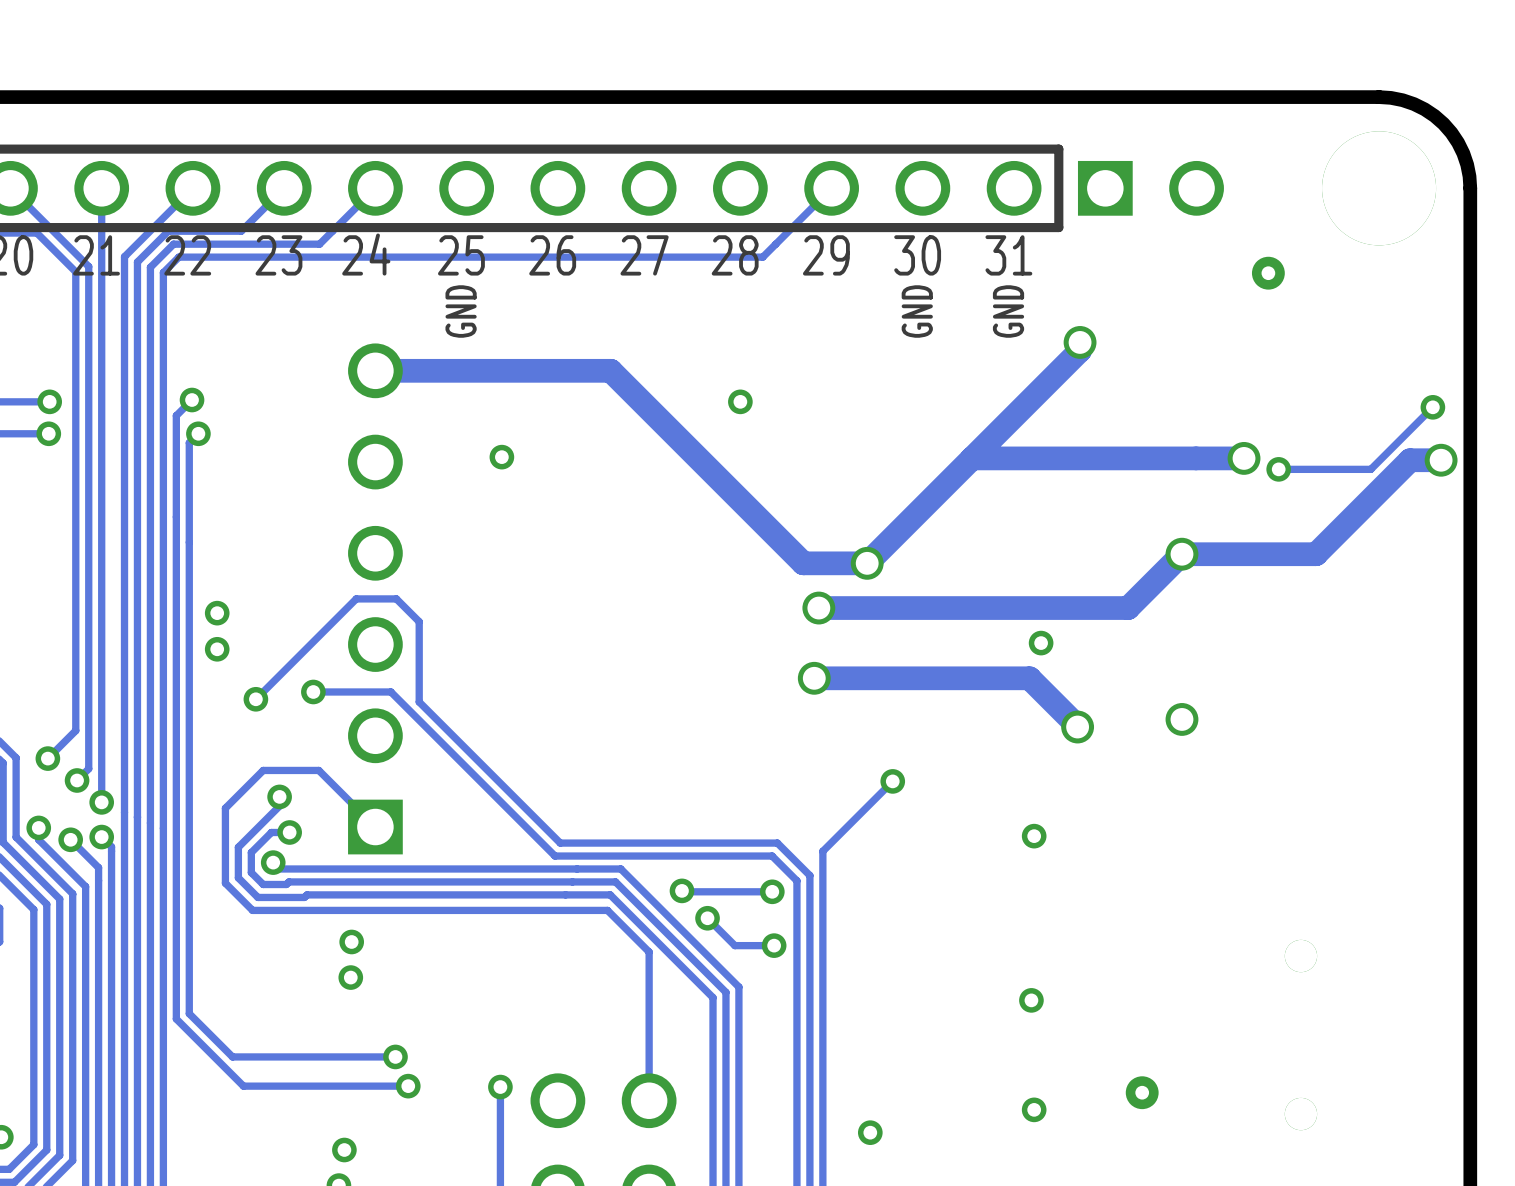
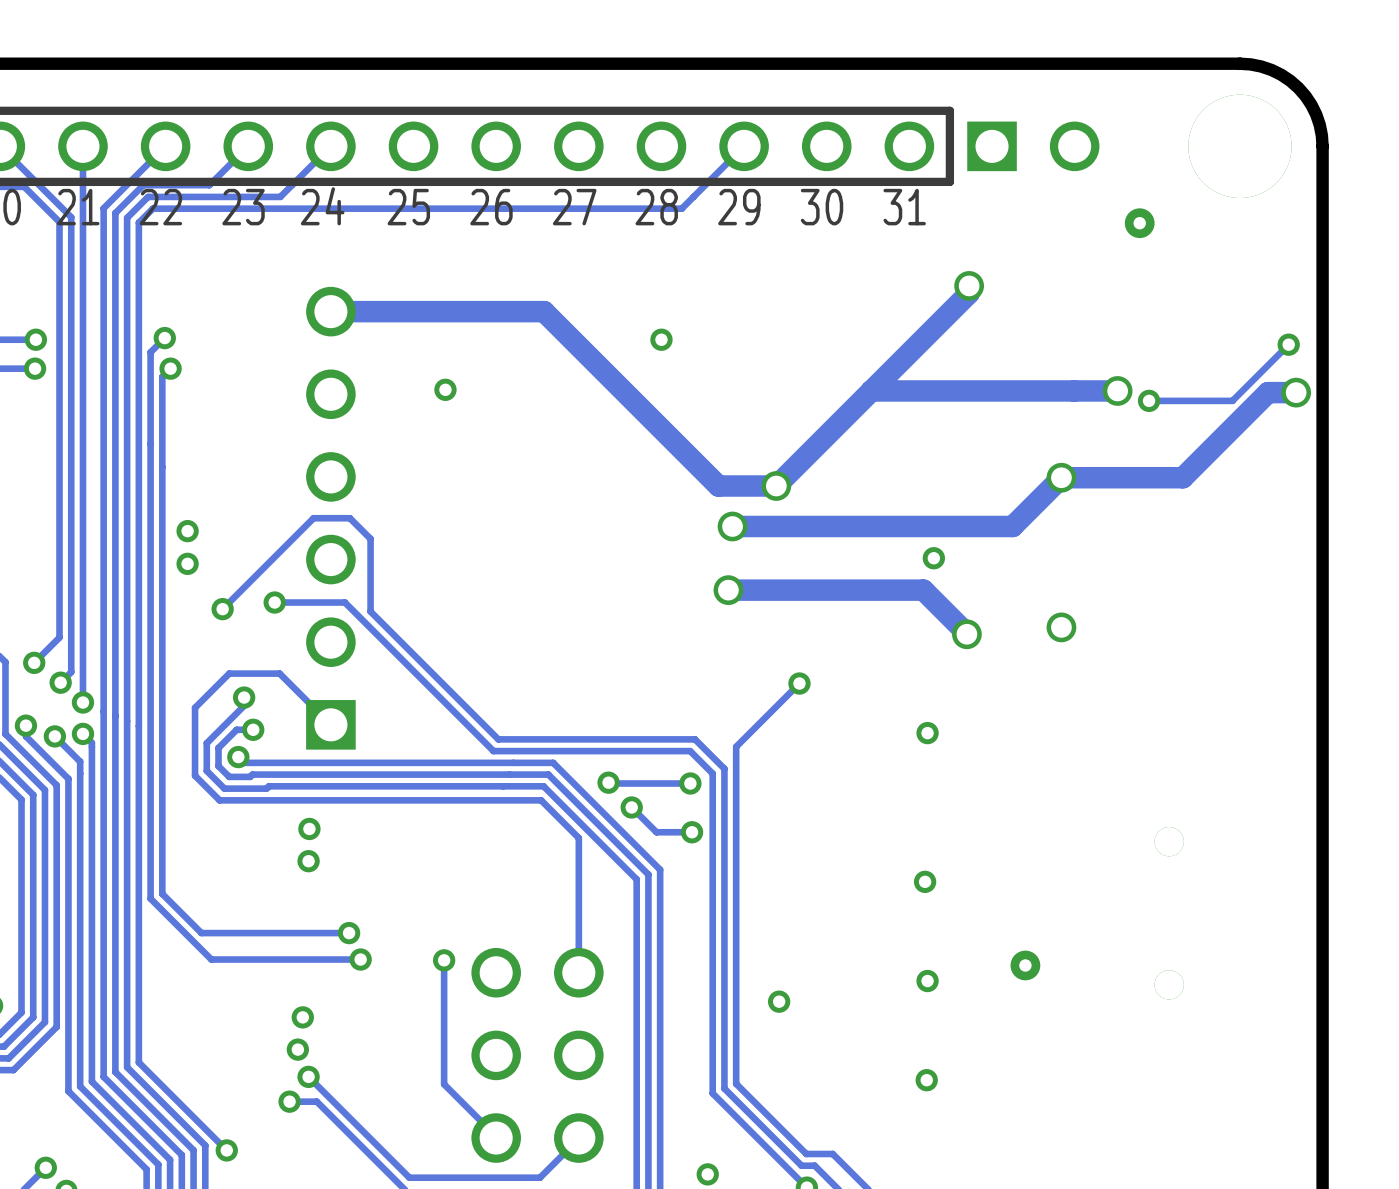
text: GND (461, 311) -> none
text: GND (917, 311) -> none
text: GND (1008, 311) -> none

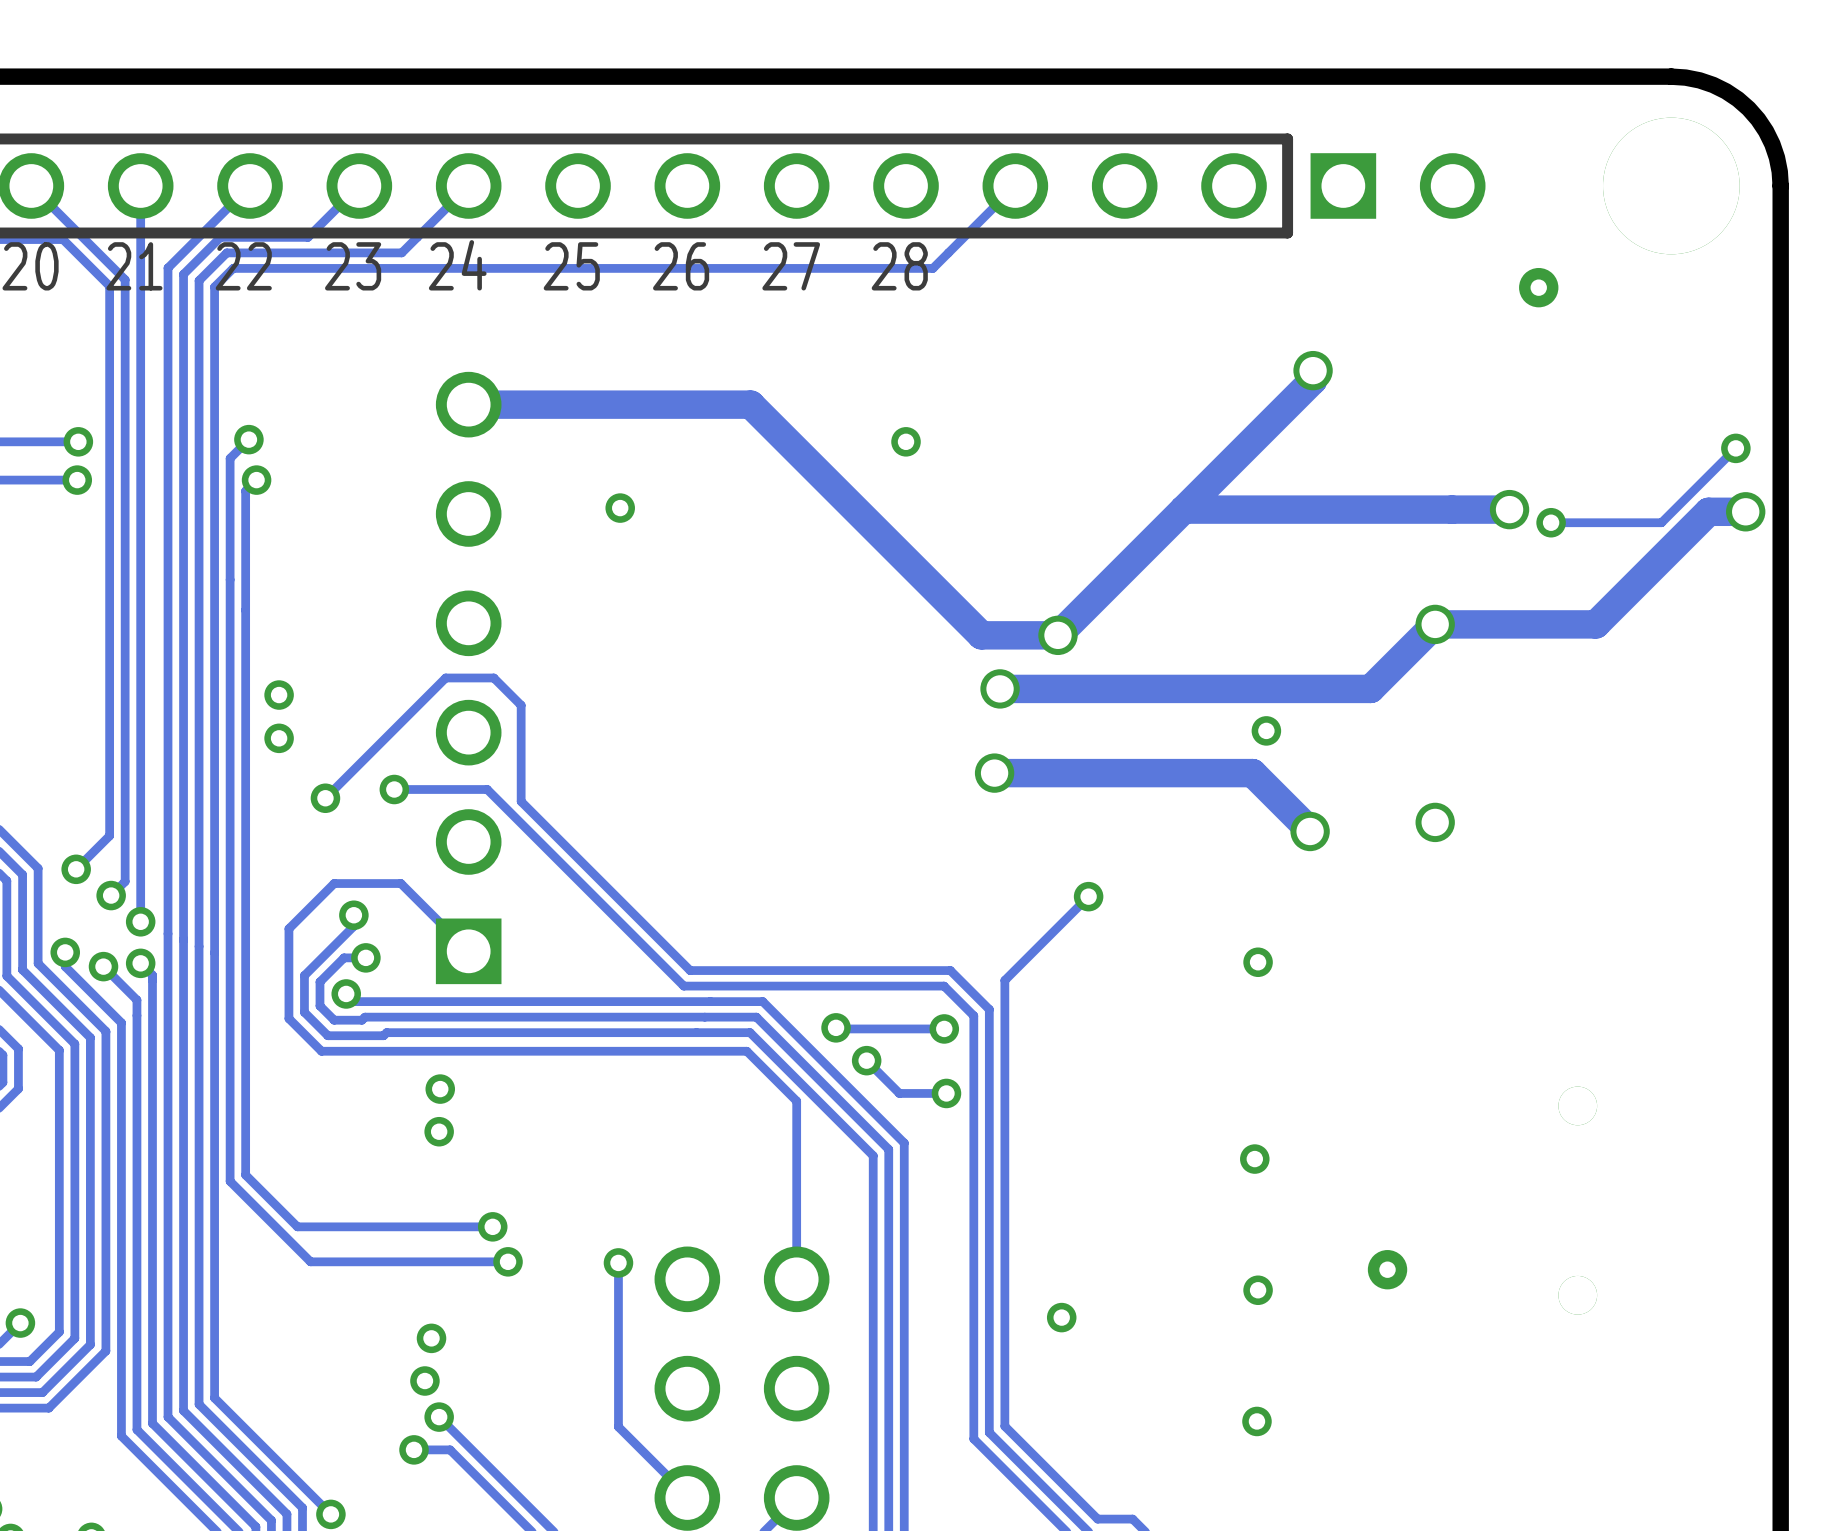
text: 29 (739, 207) -> none
text: 30 (822, 207) -> none
text: 31 (904, 207) -> none

